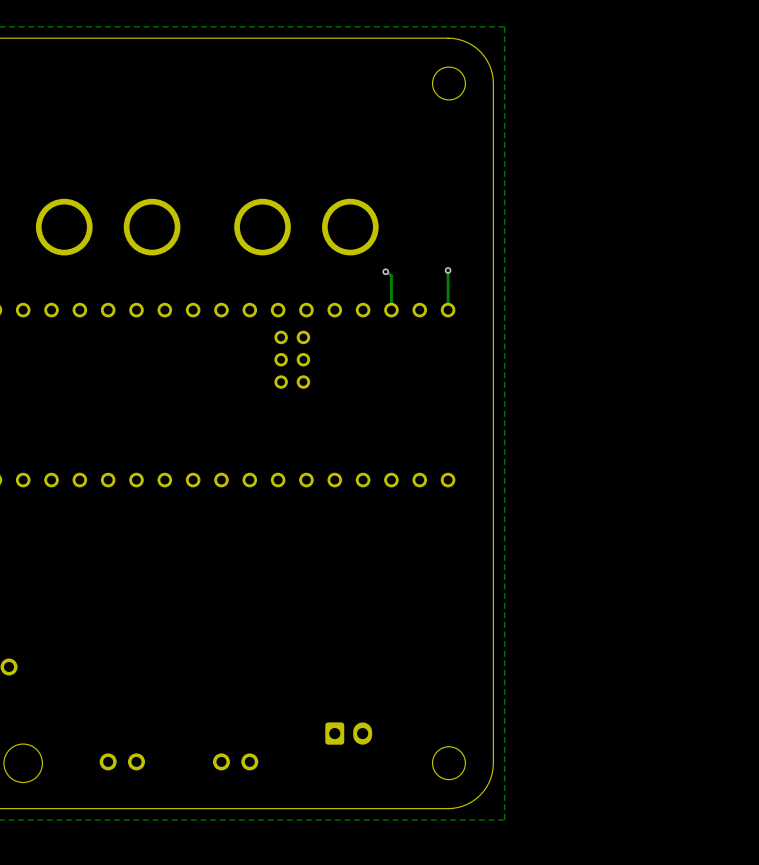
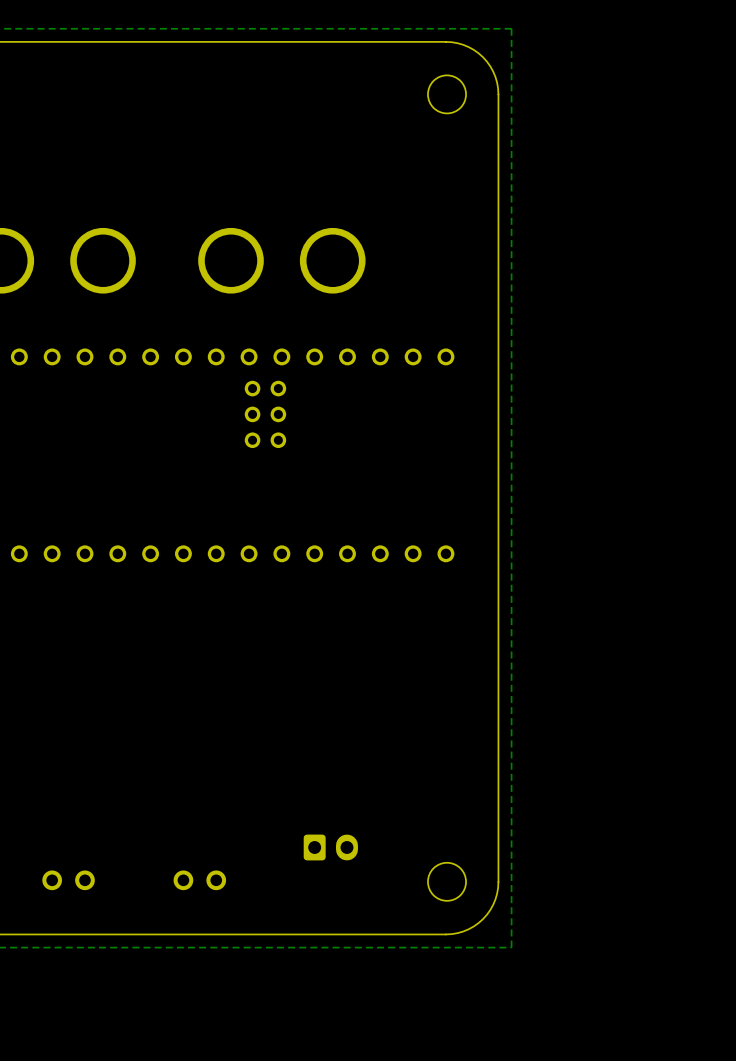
track: (448, 270) (448, 310) -> none
via: (448, 270) -> none
track: (385, 271) (391, 276) (391, 310) -> none
via: (385, 271) -> none

